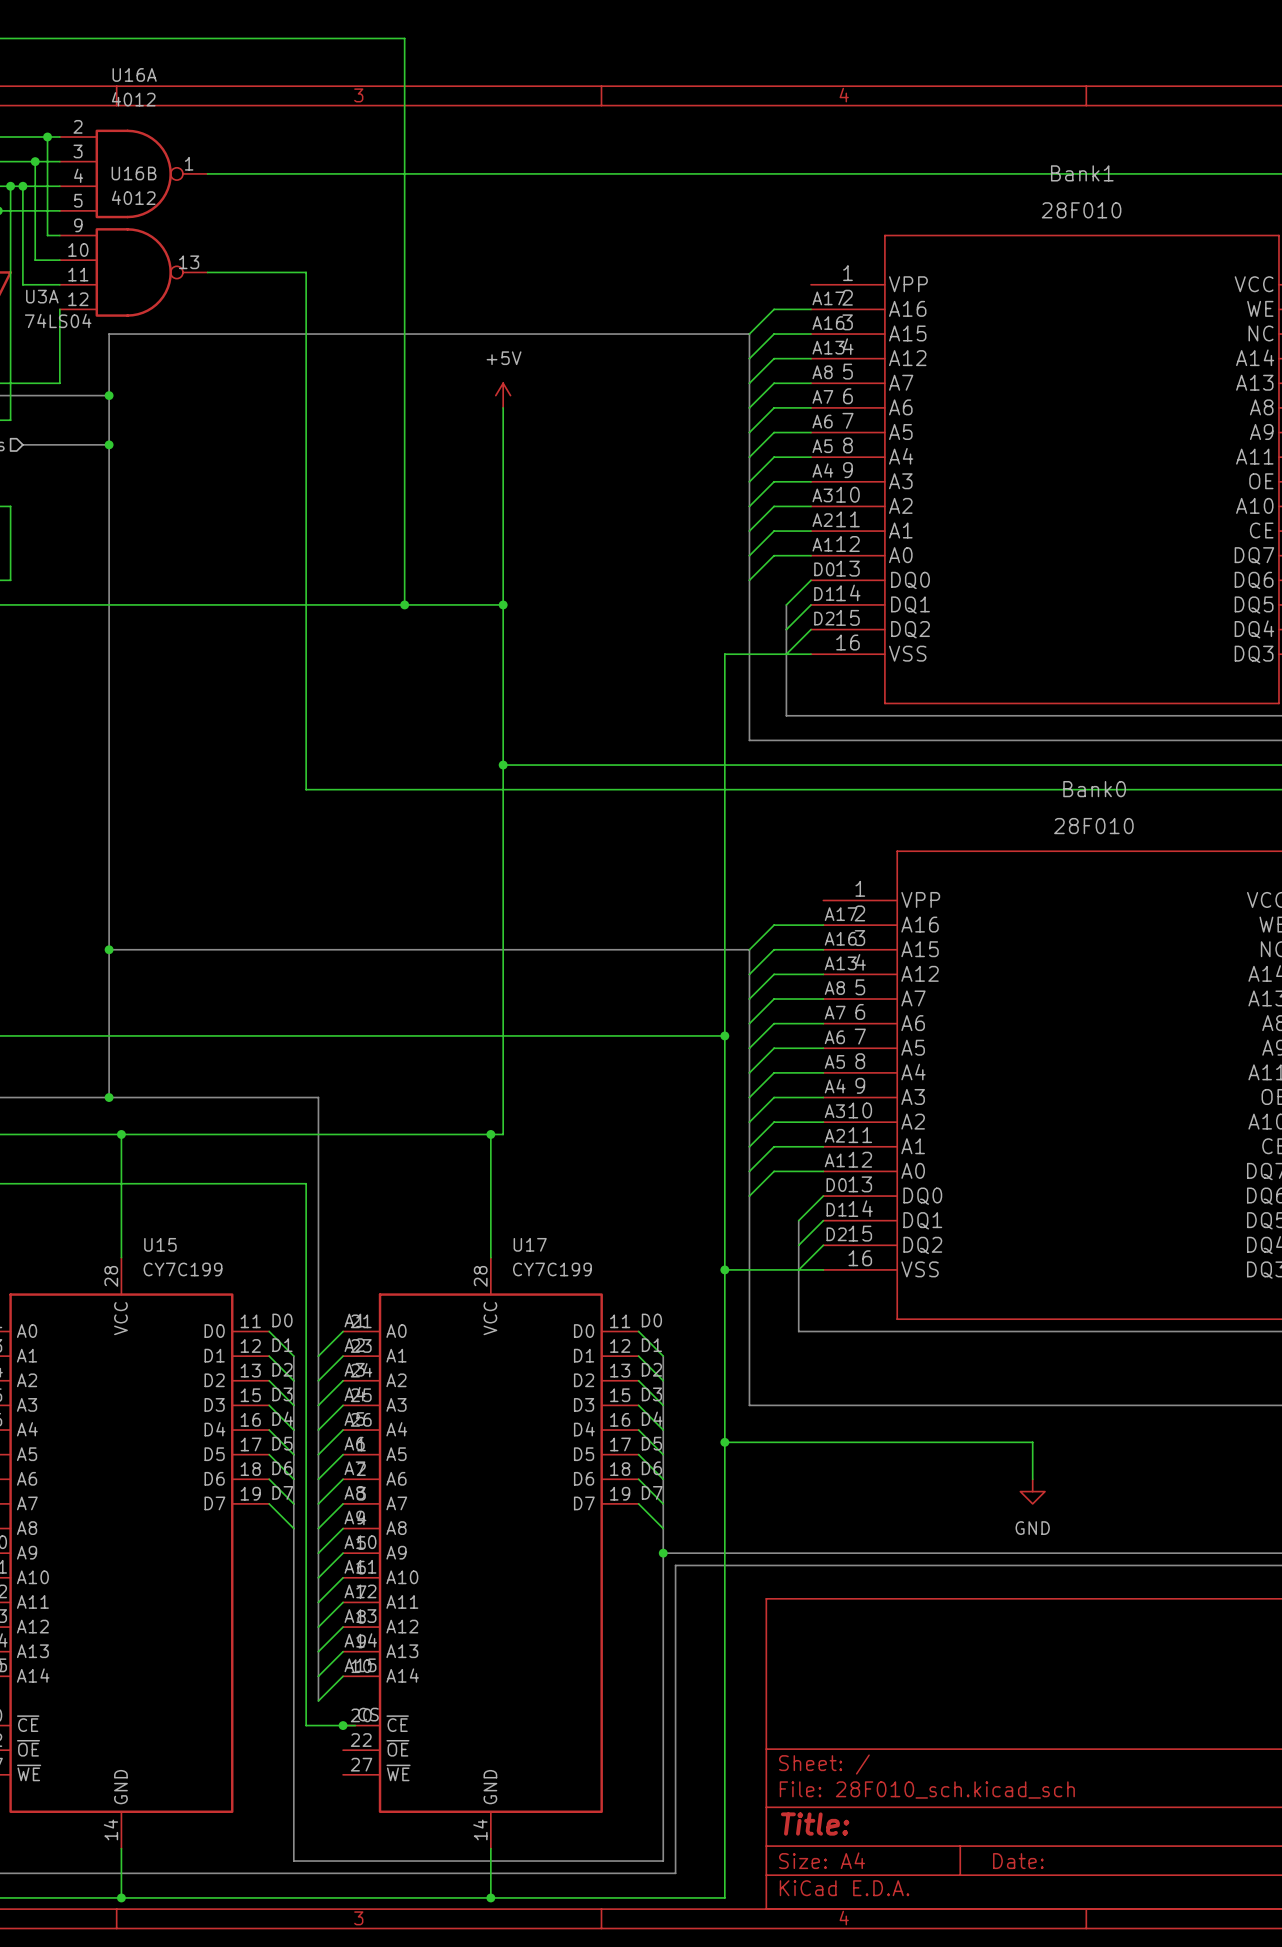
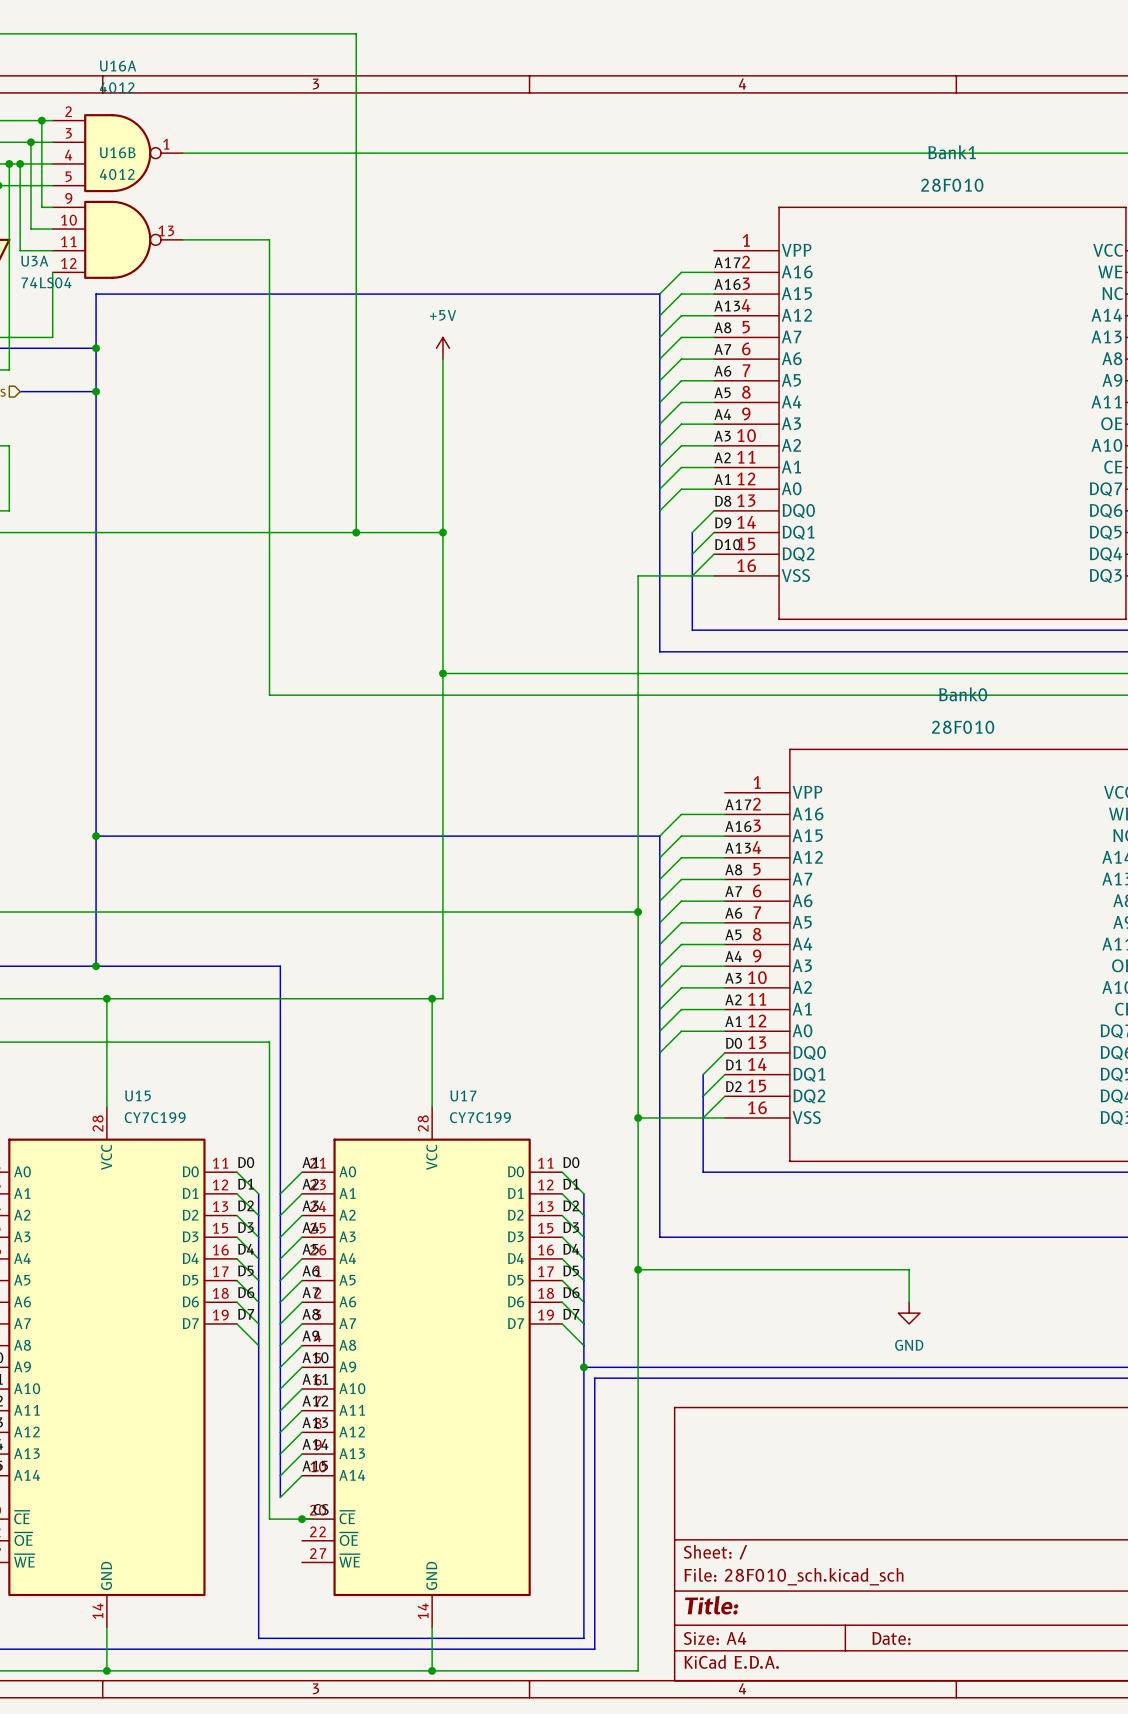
label: D0 (824, 569) -> D8 (723, 501)
label: D1 (824, 593) -> D9 (723, 522)
label: D2 (824, 618) -> D10 (727, 544)

